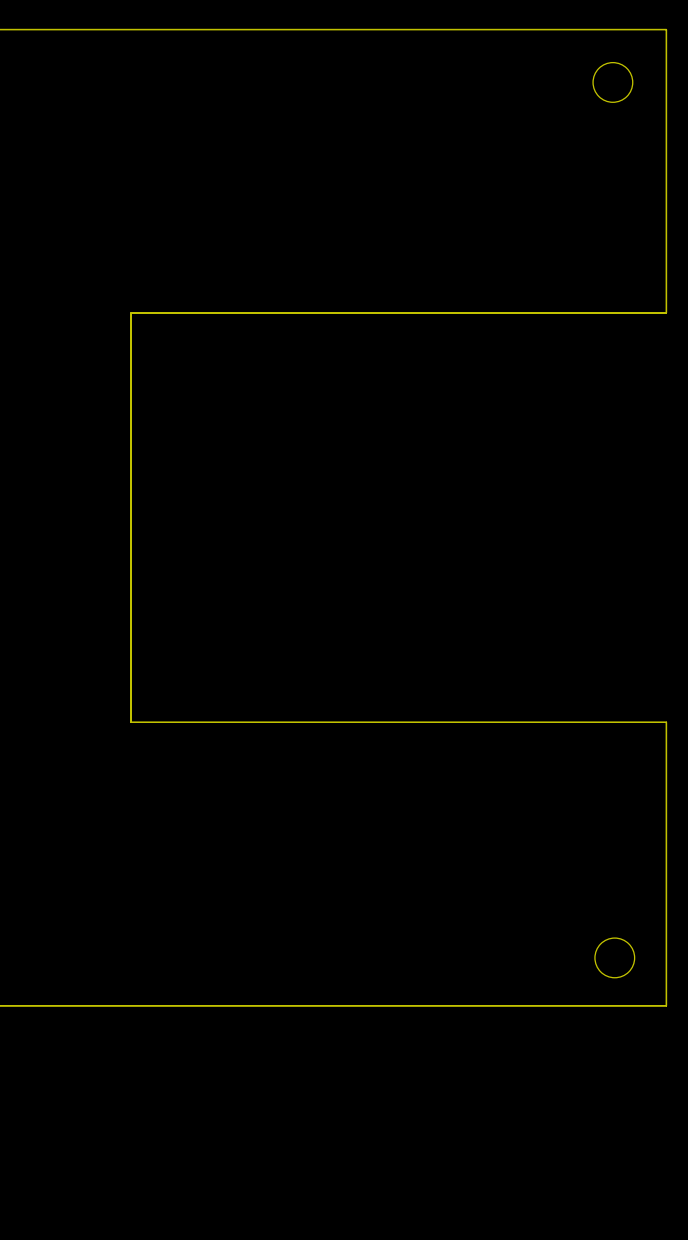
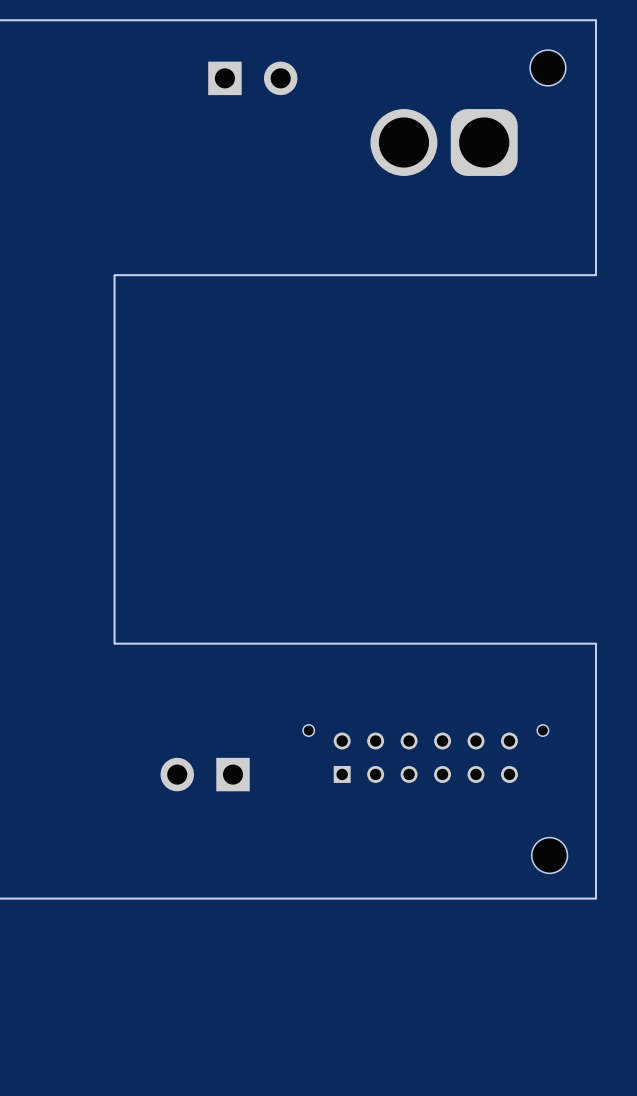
part: none -> (252, 78)
part: none -> (444, 142)
part: none -> (425, 753)
part: none -> (205, 774)

